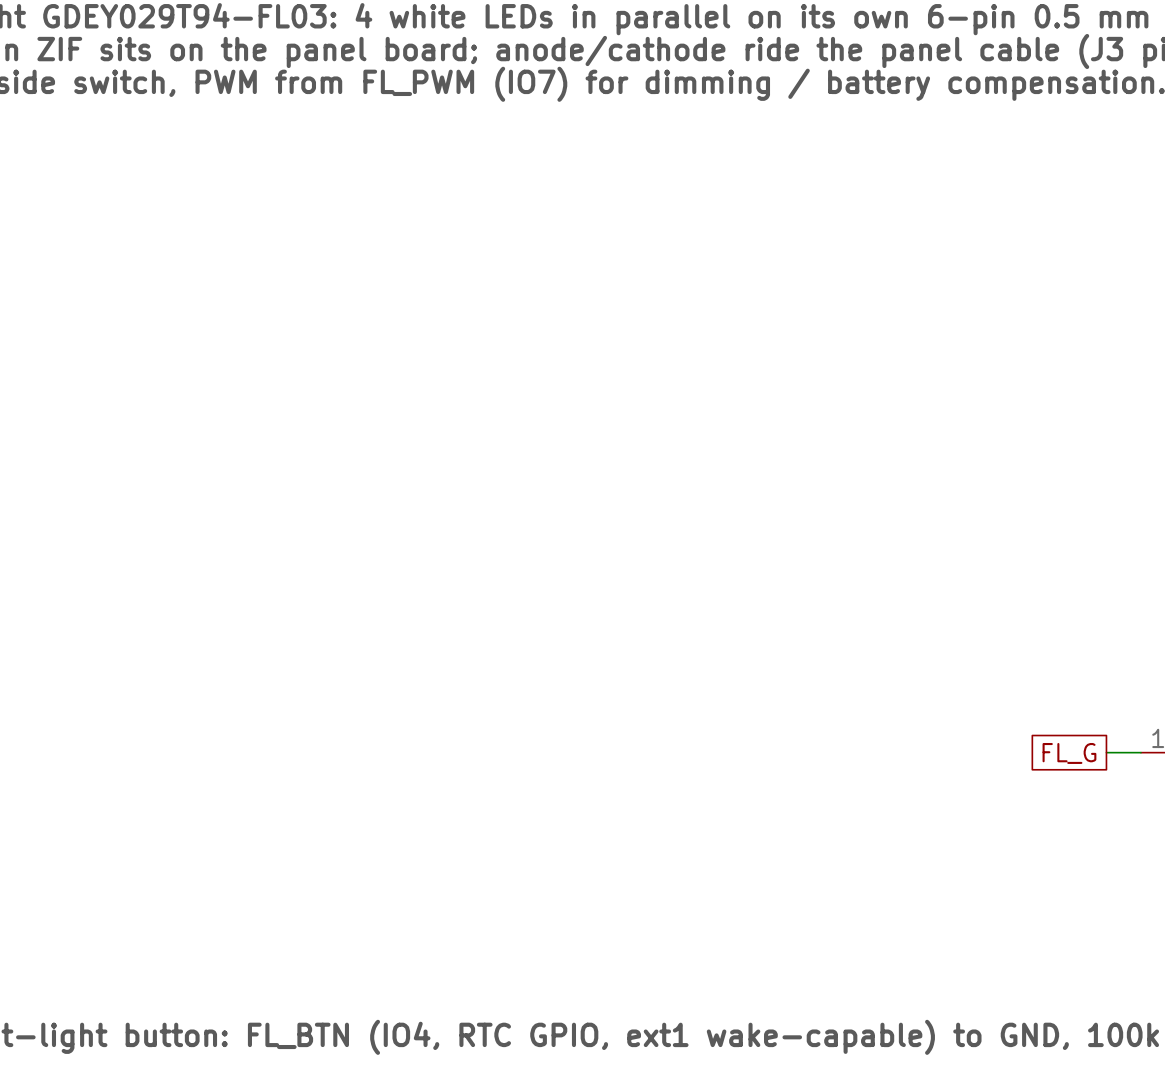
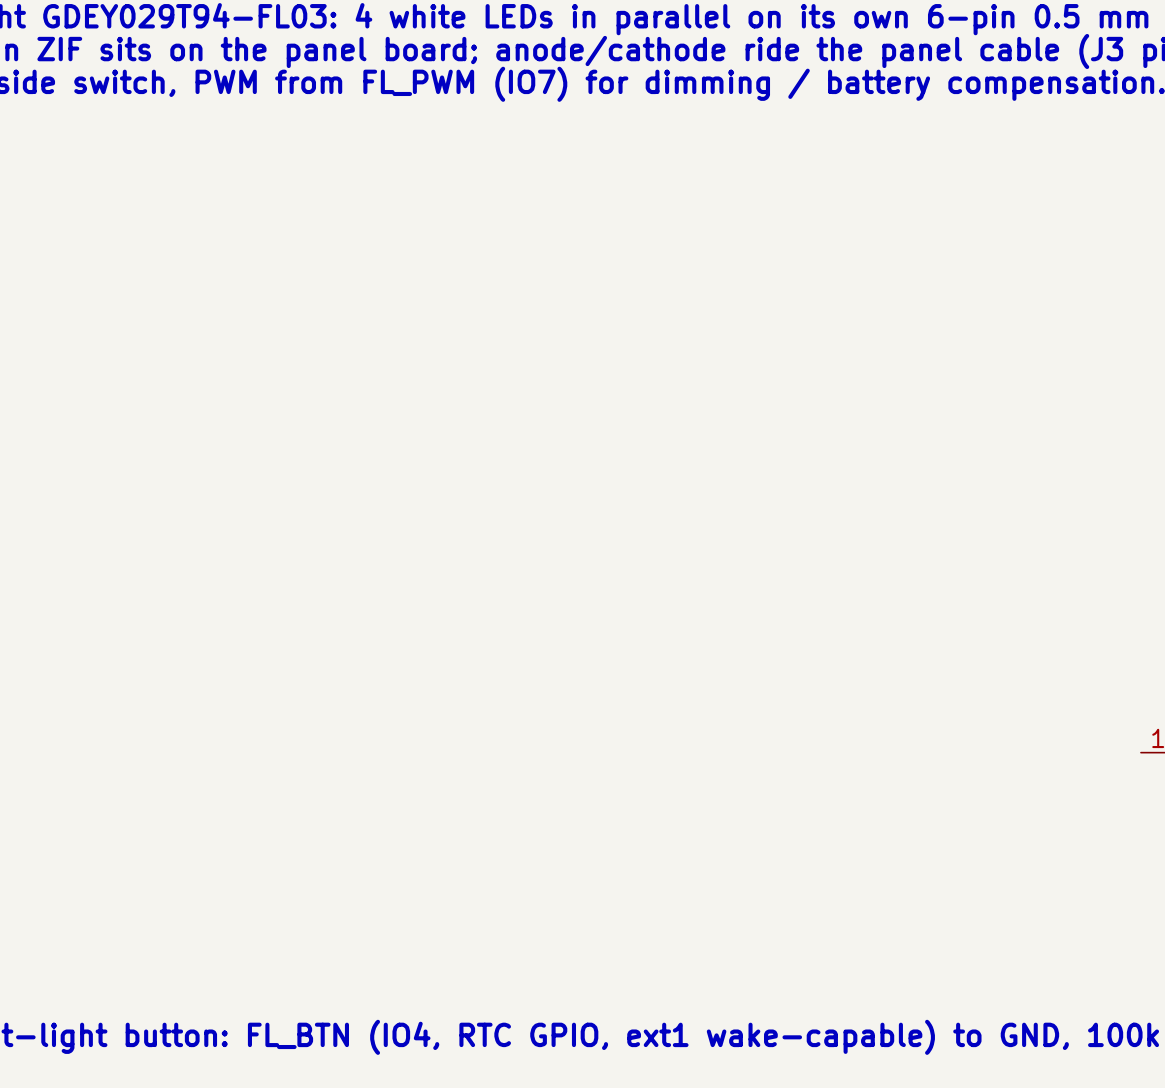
wire: (1106, 752) (1140, 752) -> none
global label: FL_G (1069, 753) -> none

